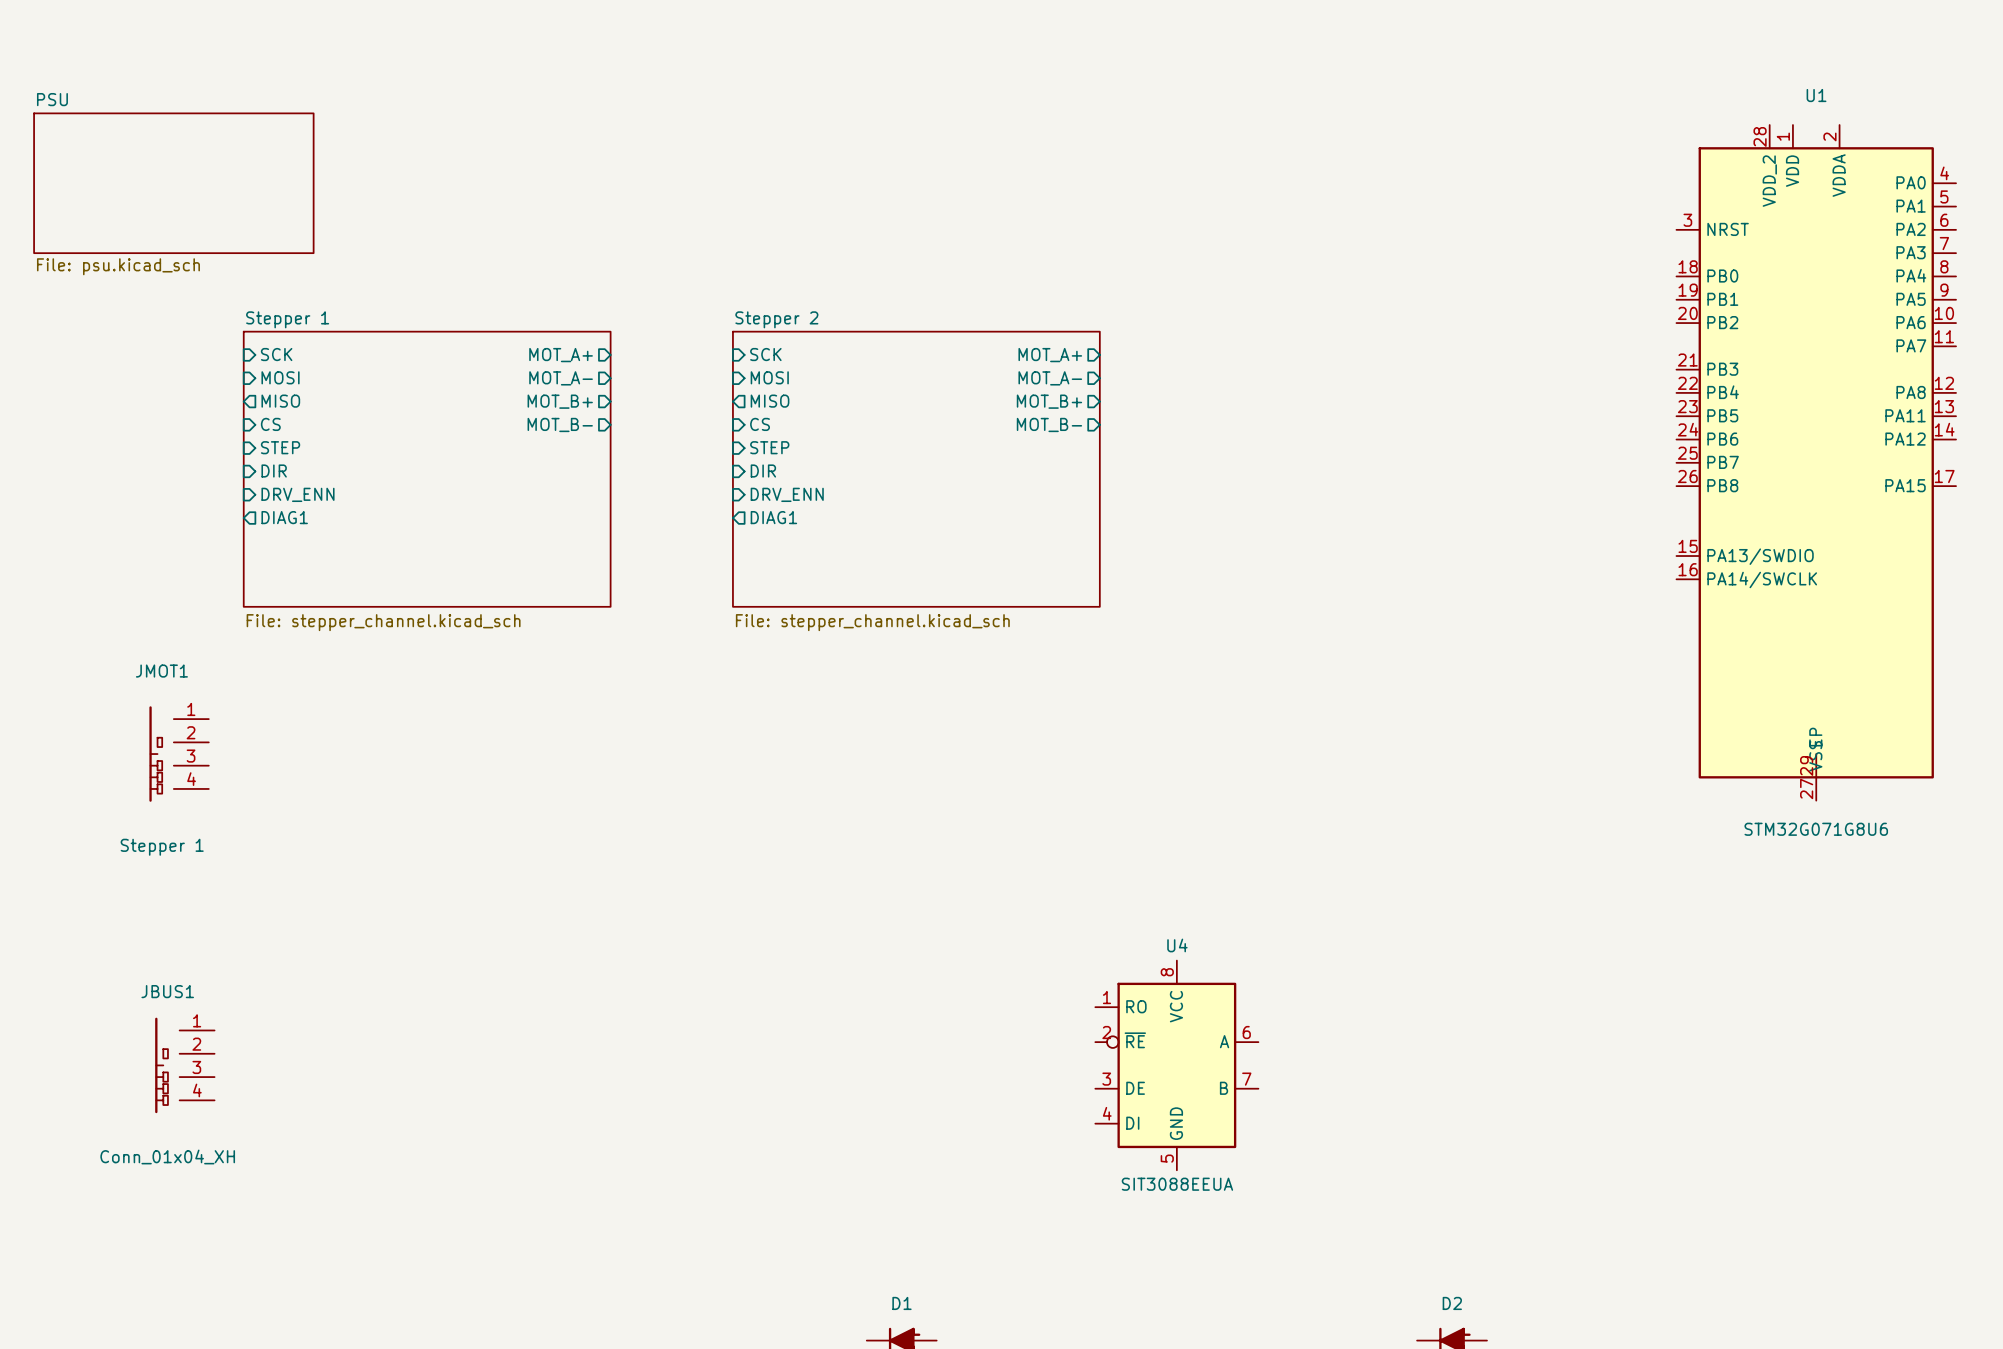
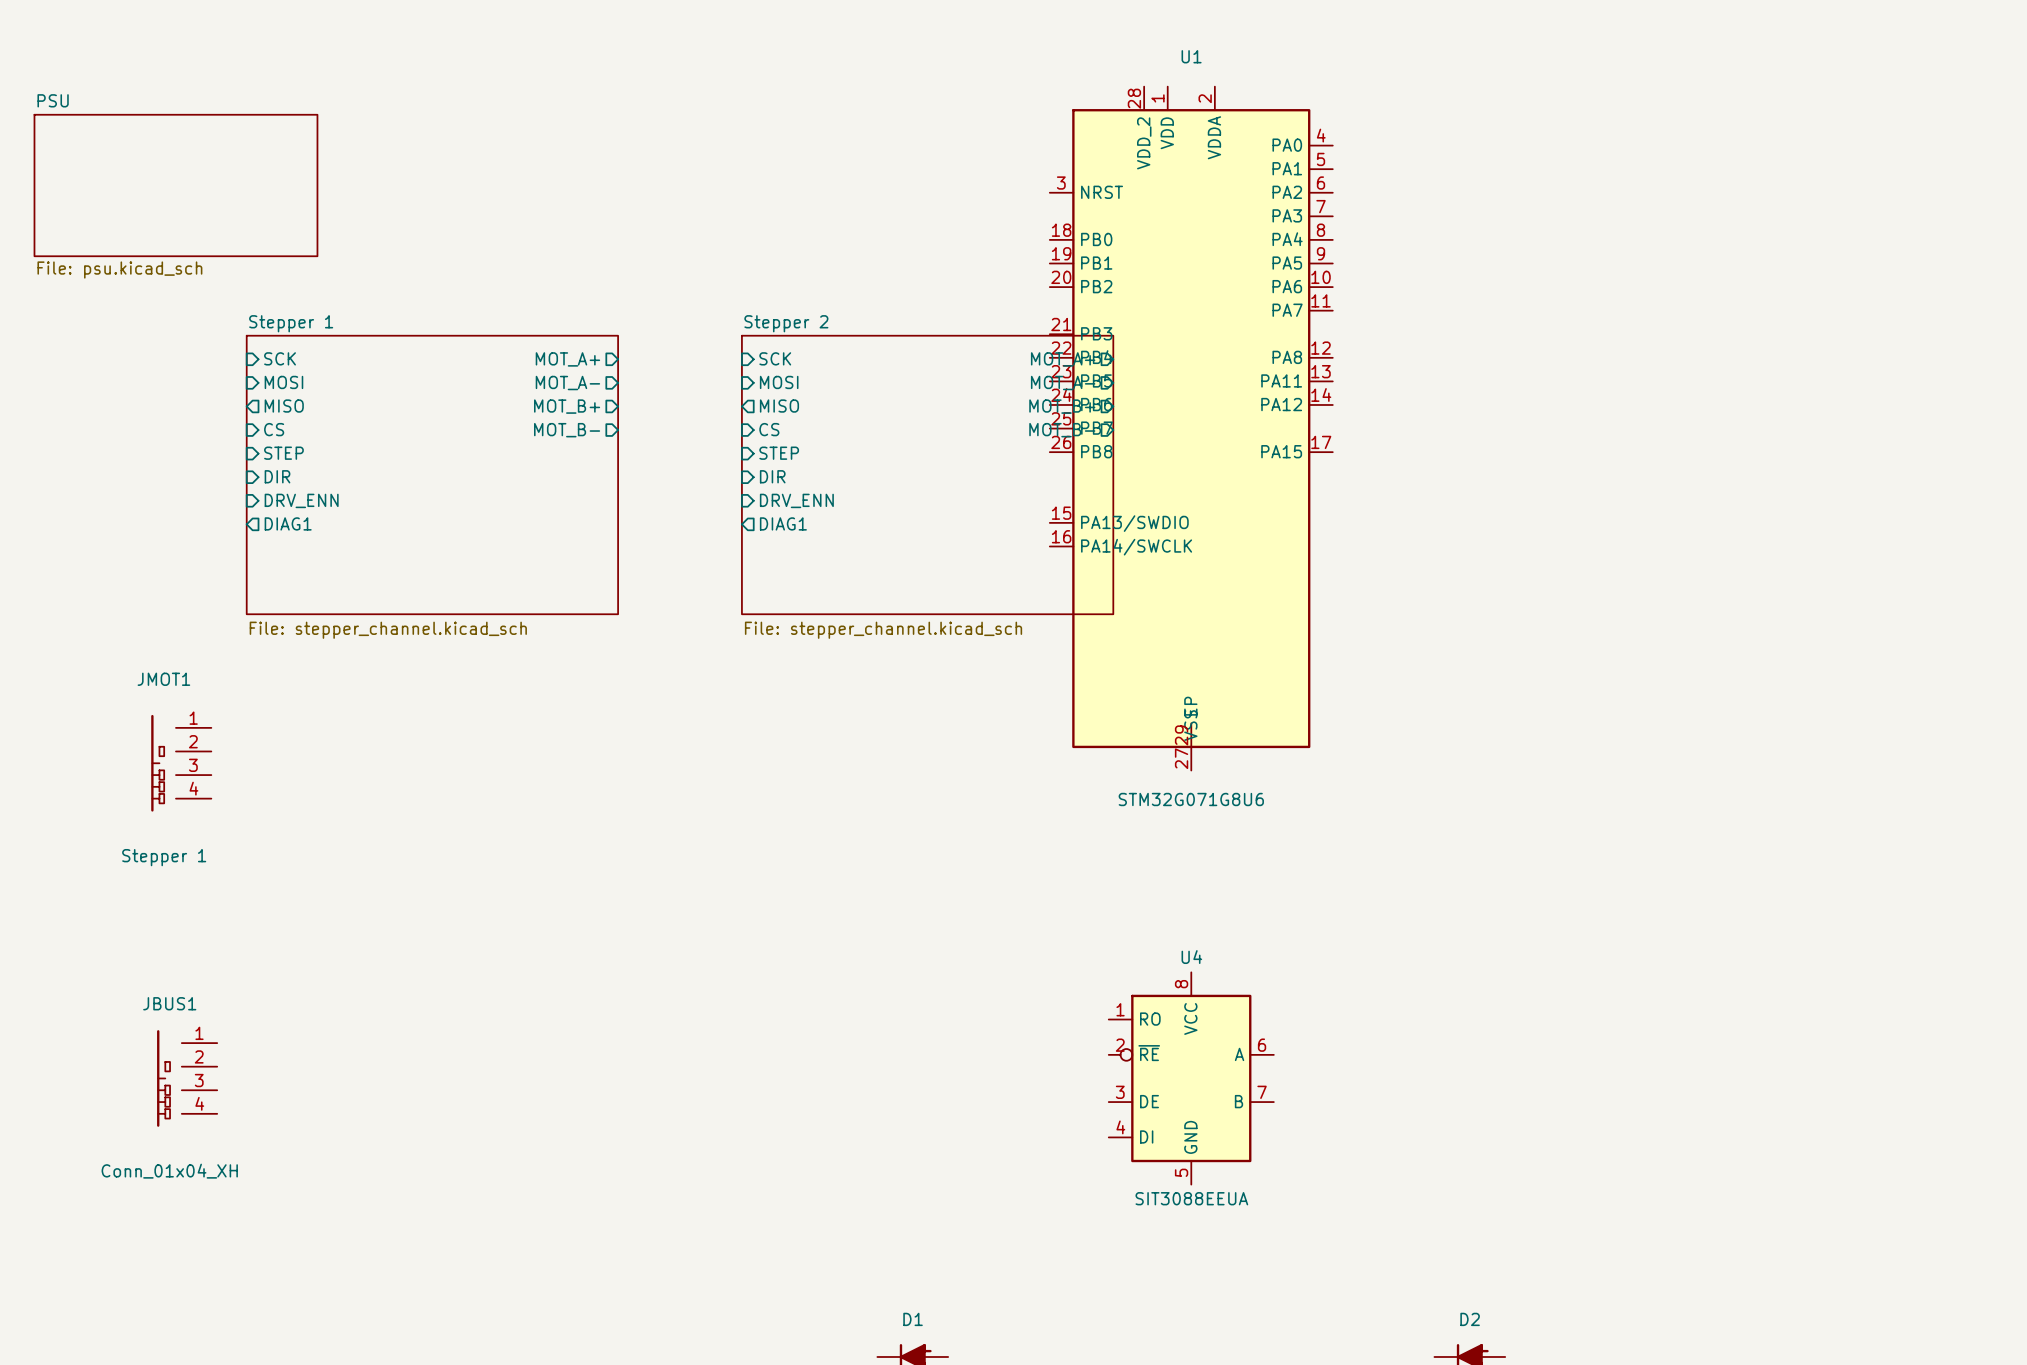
U1 position: (1816, 462) -> (1191, 428)

